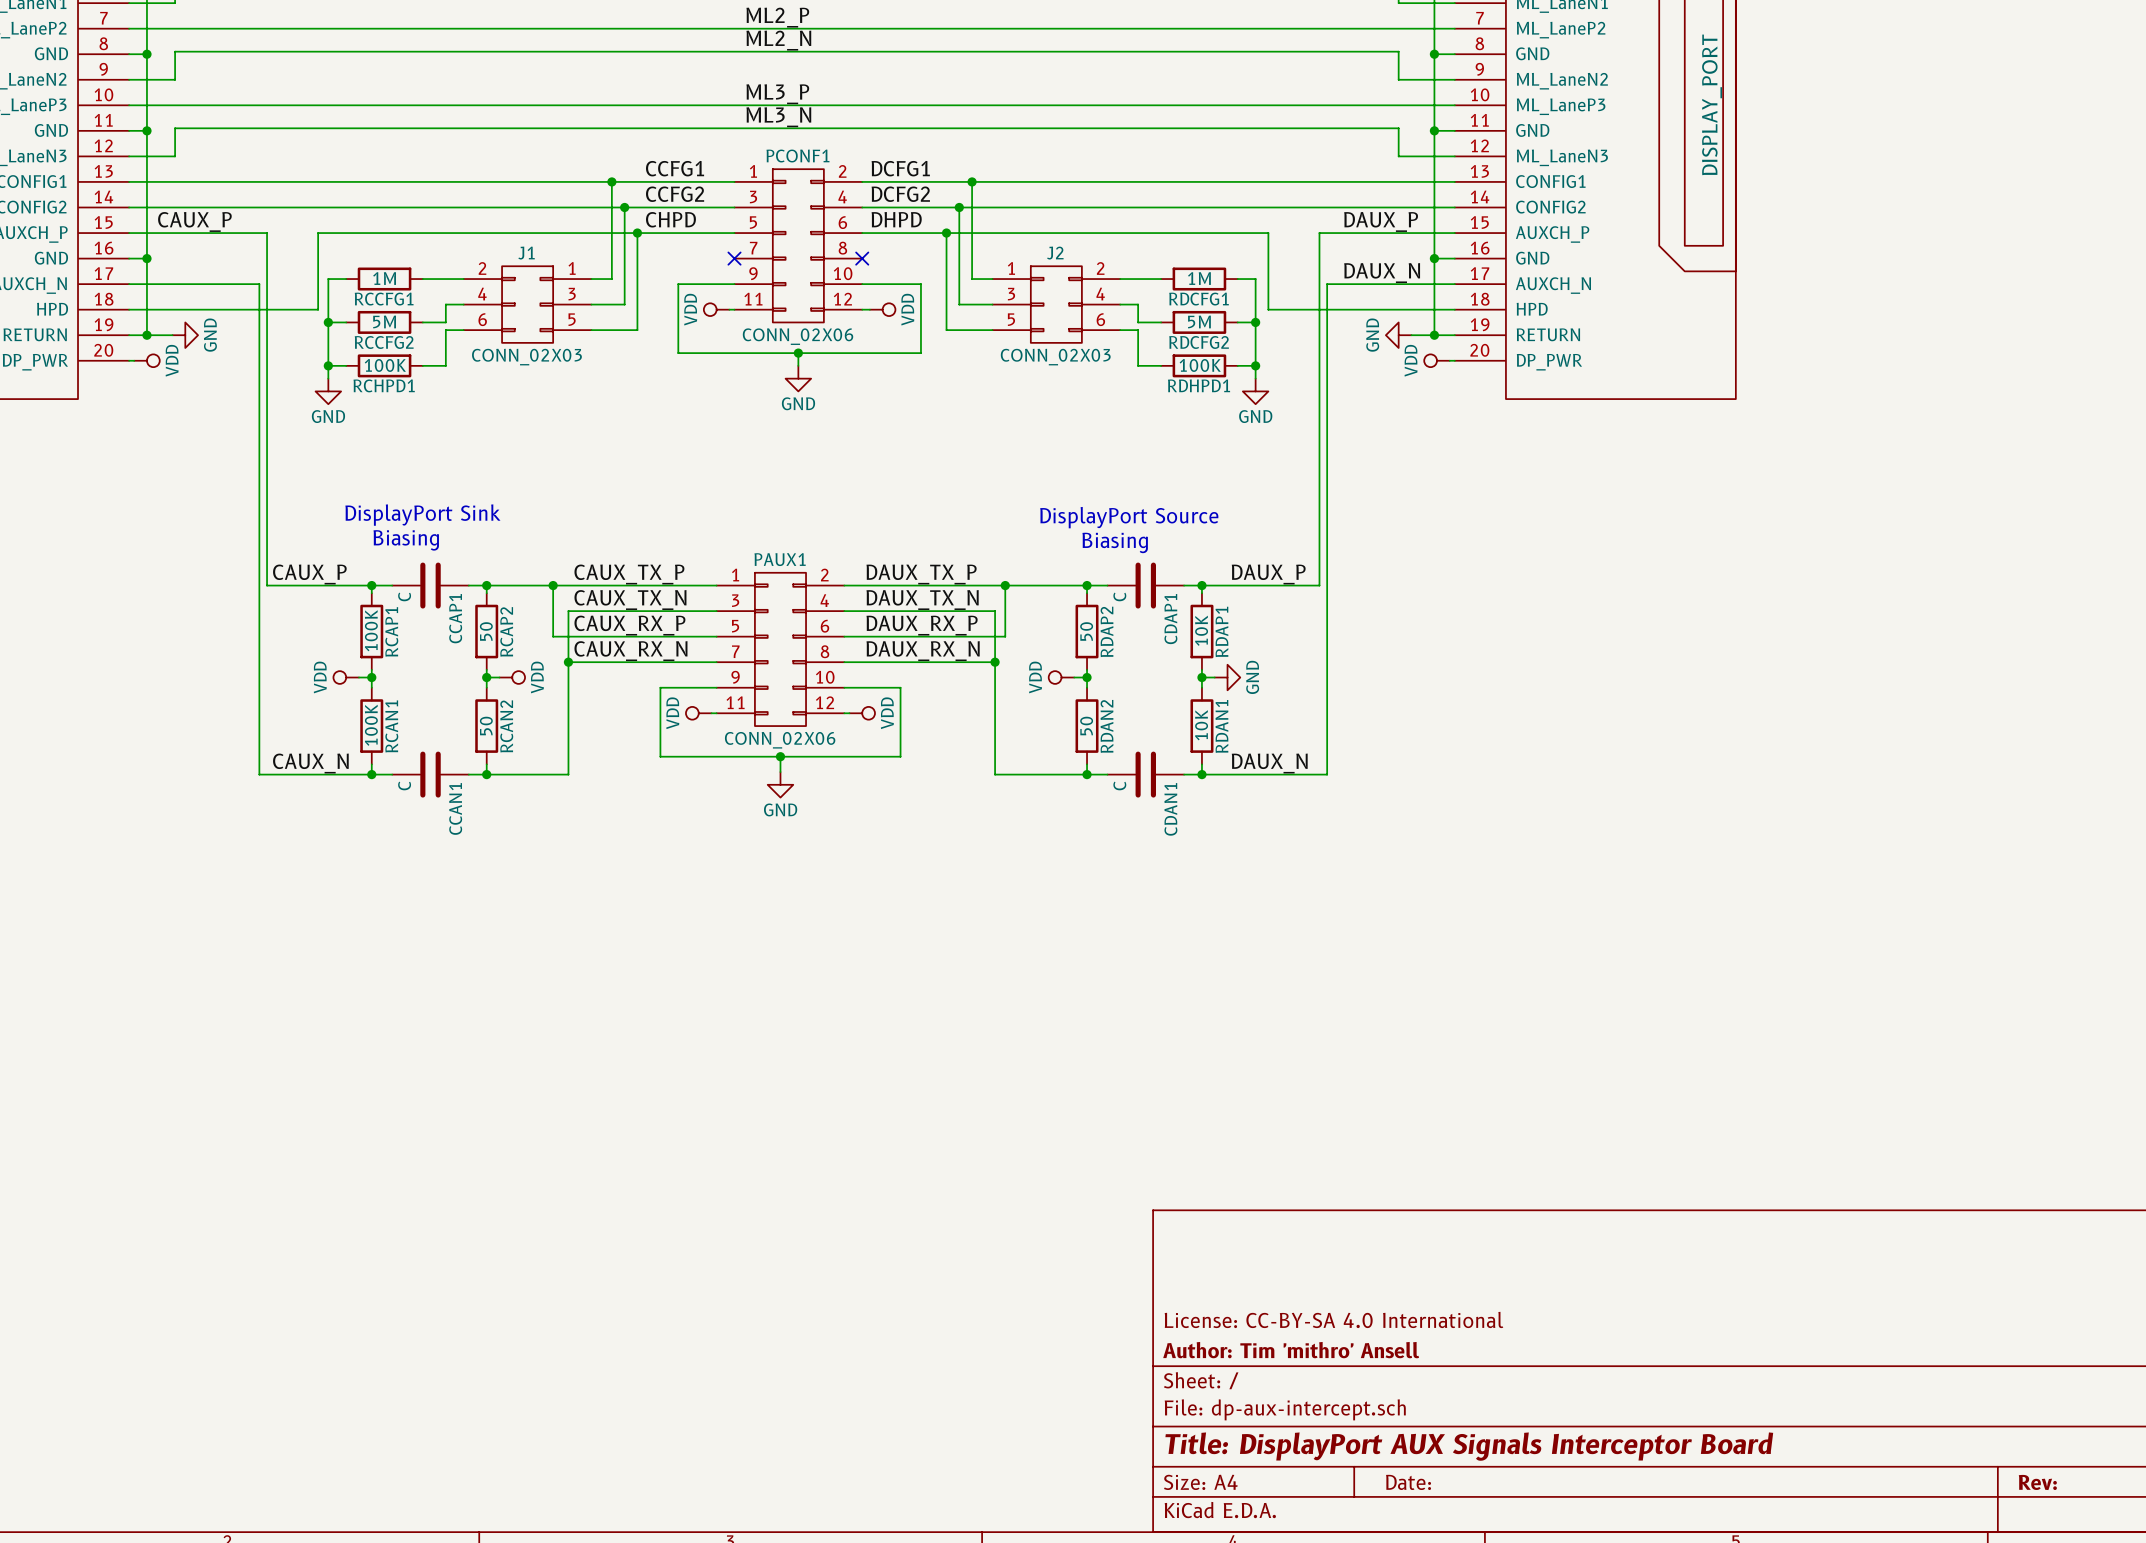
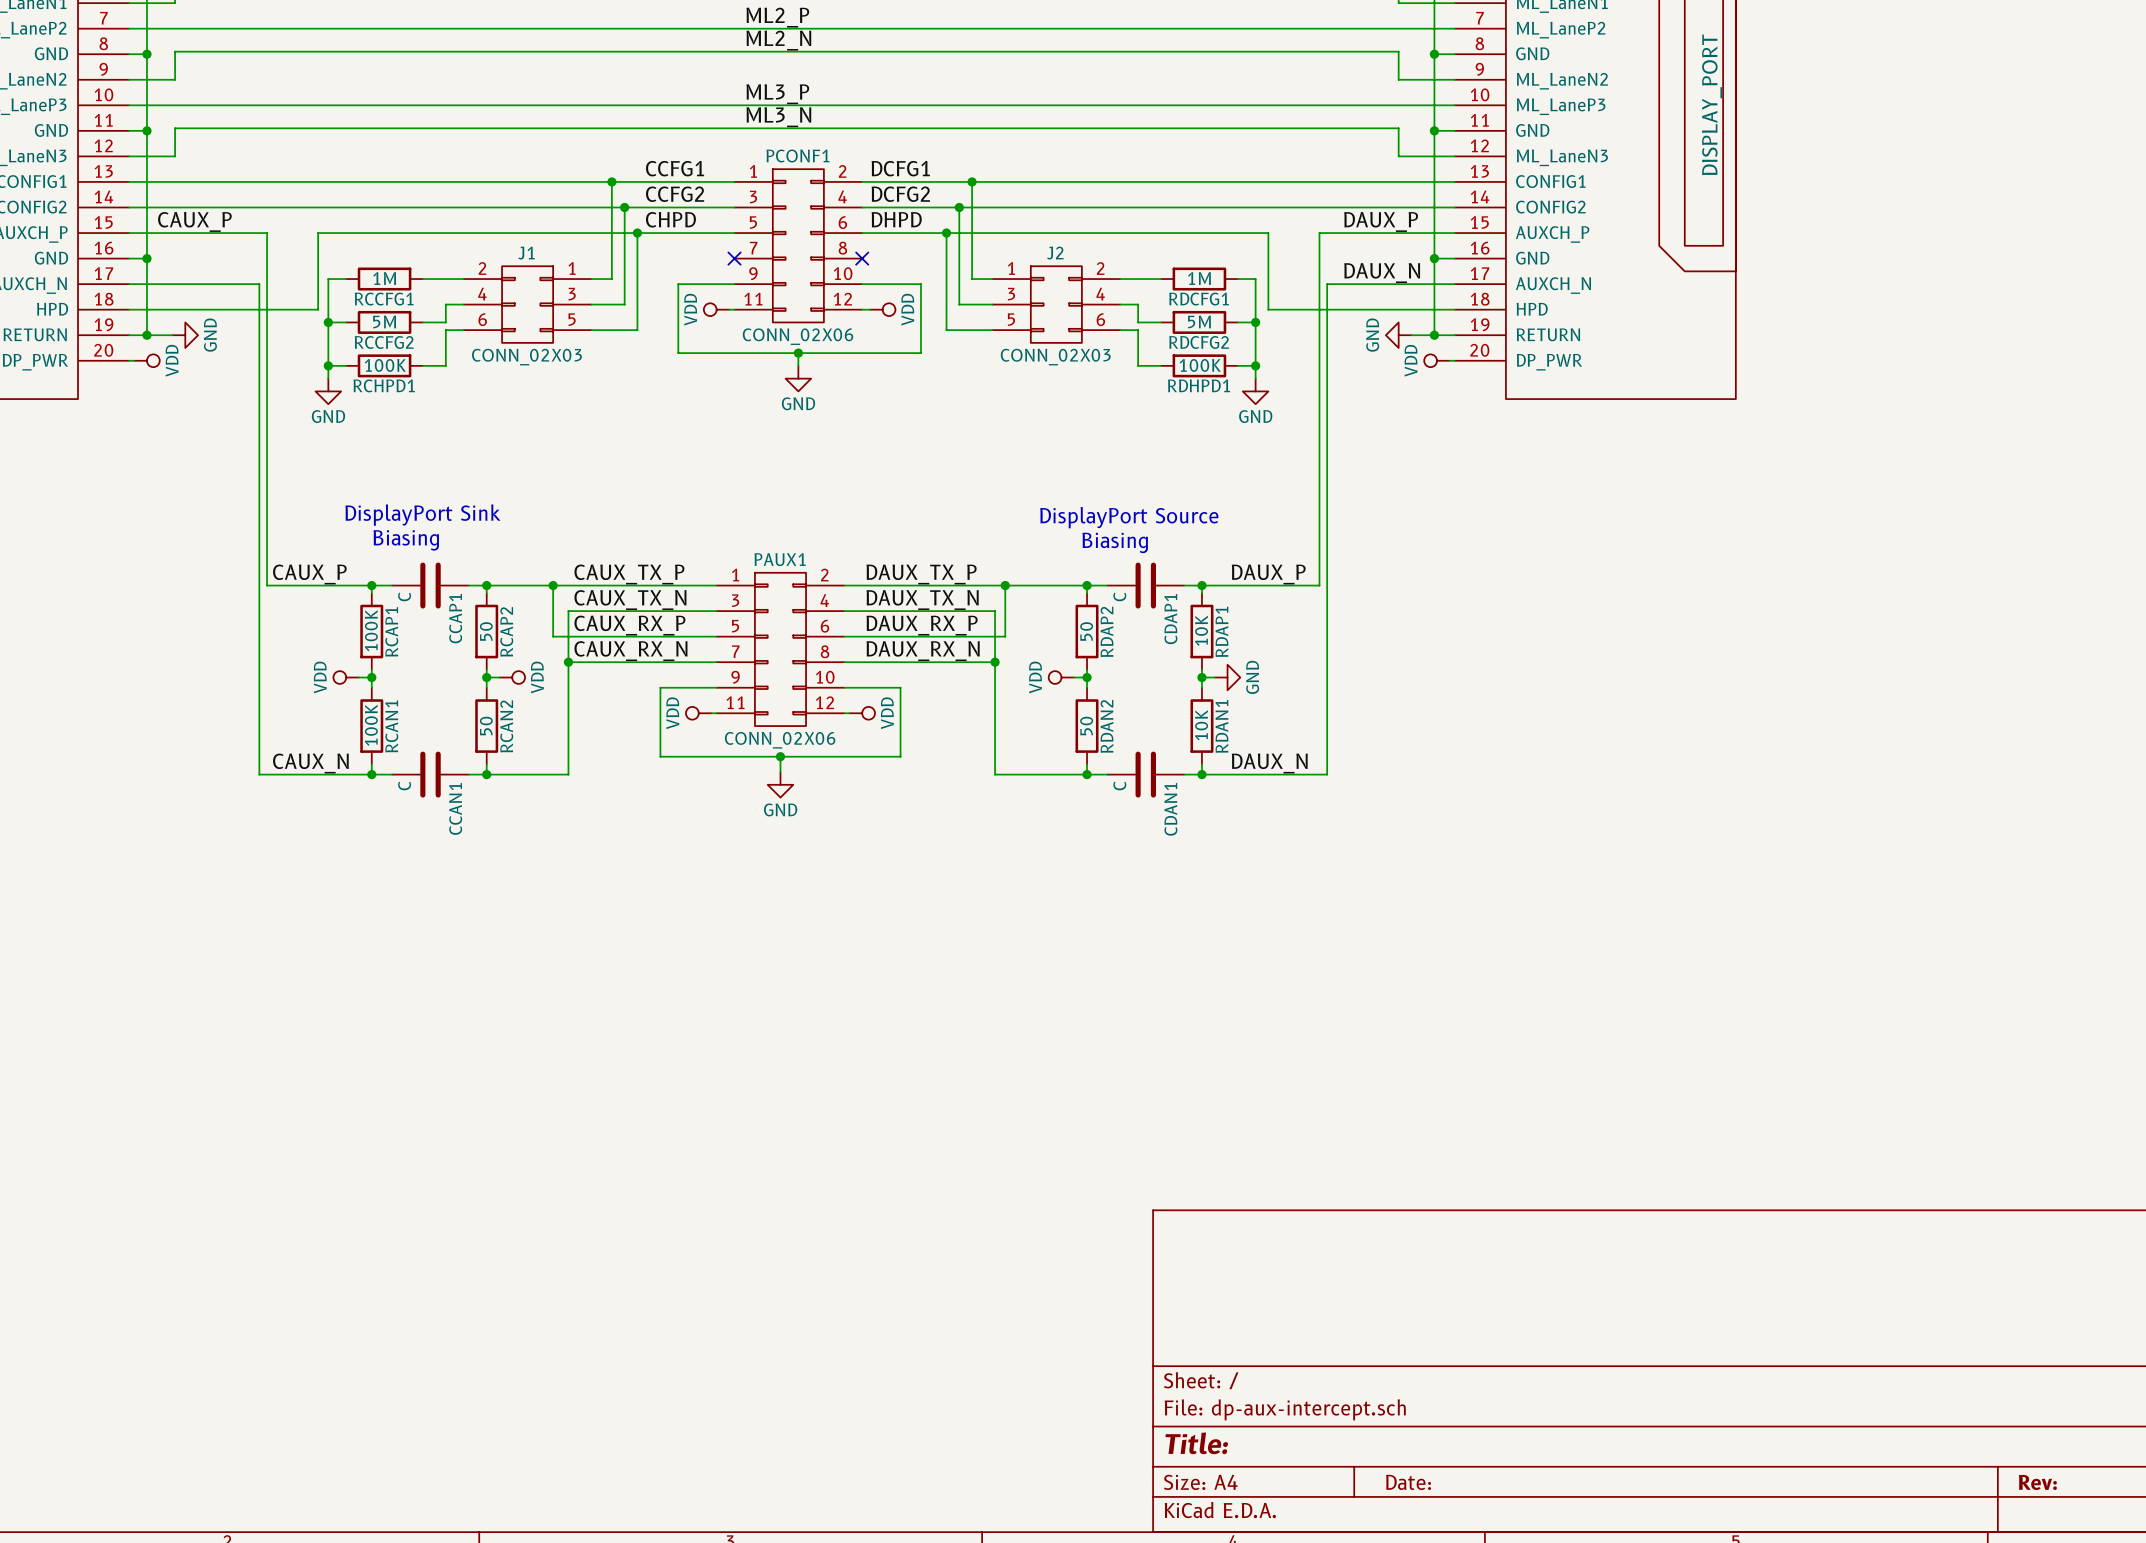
title block: License: CC-BY-SA 4.0 International (1333, 1319) -> none
title block: Author: Tim 'mithro' Ansell (1291, 1350) -> none
title block: Title: DisplayPort AUX Signals Interceptor Board (1469, 1446) -> Title: (1196, 1443)

